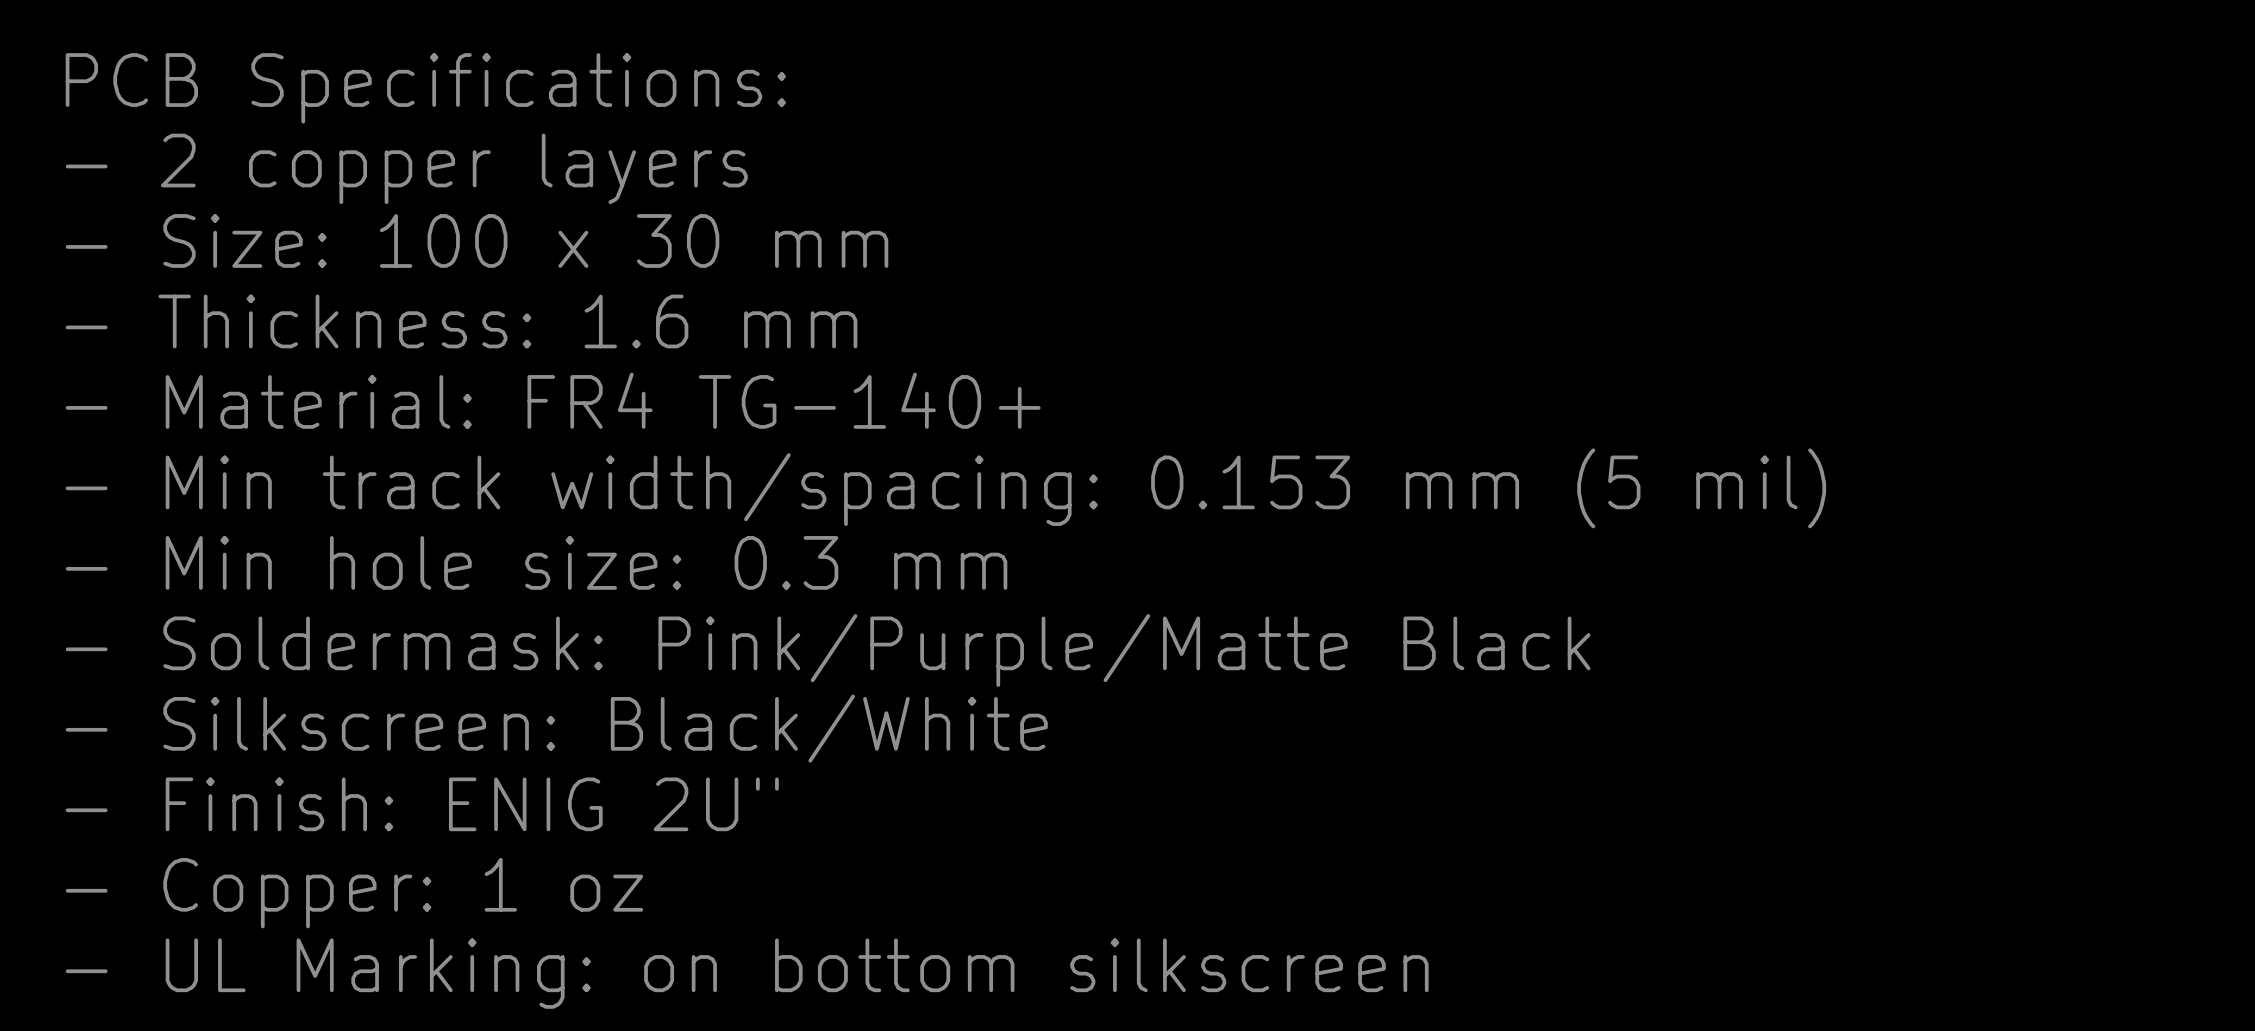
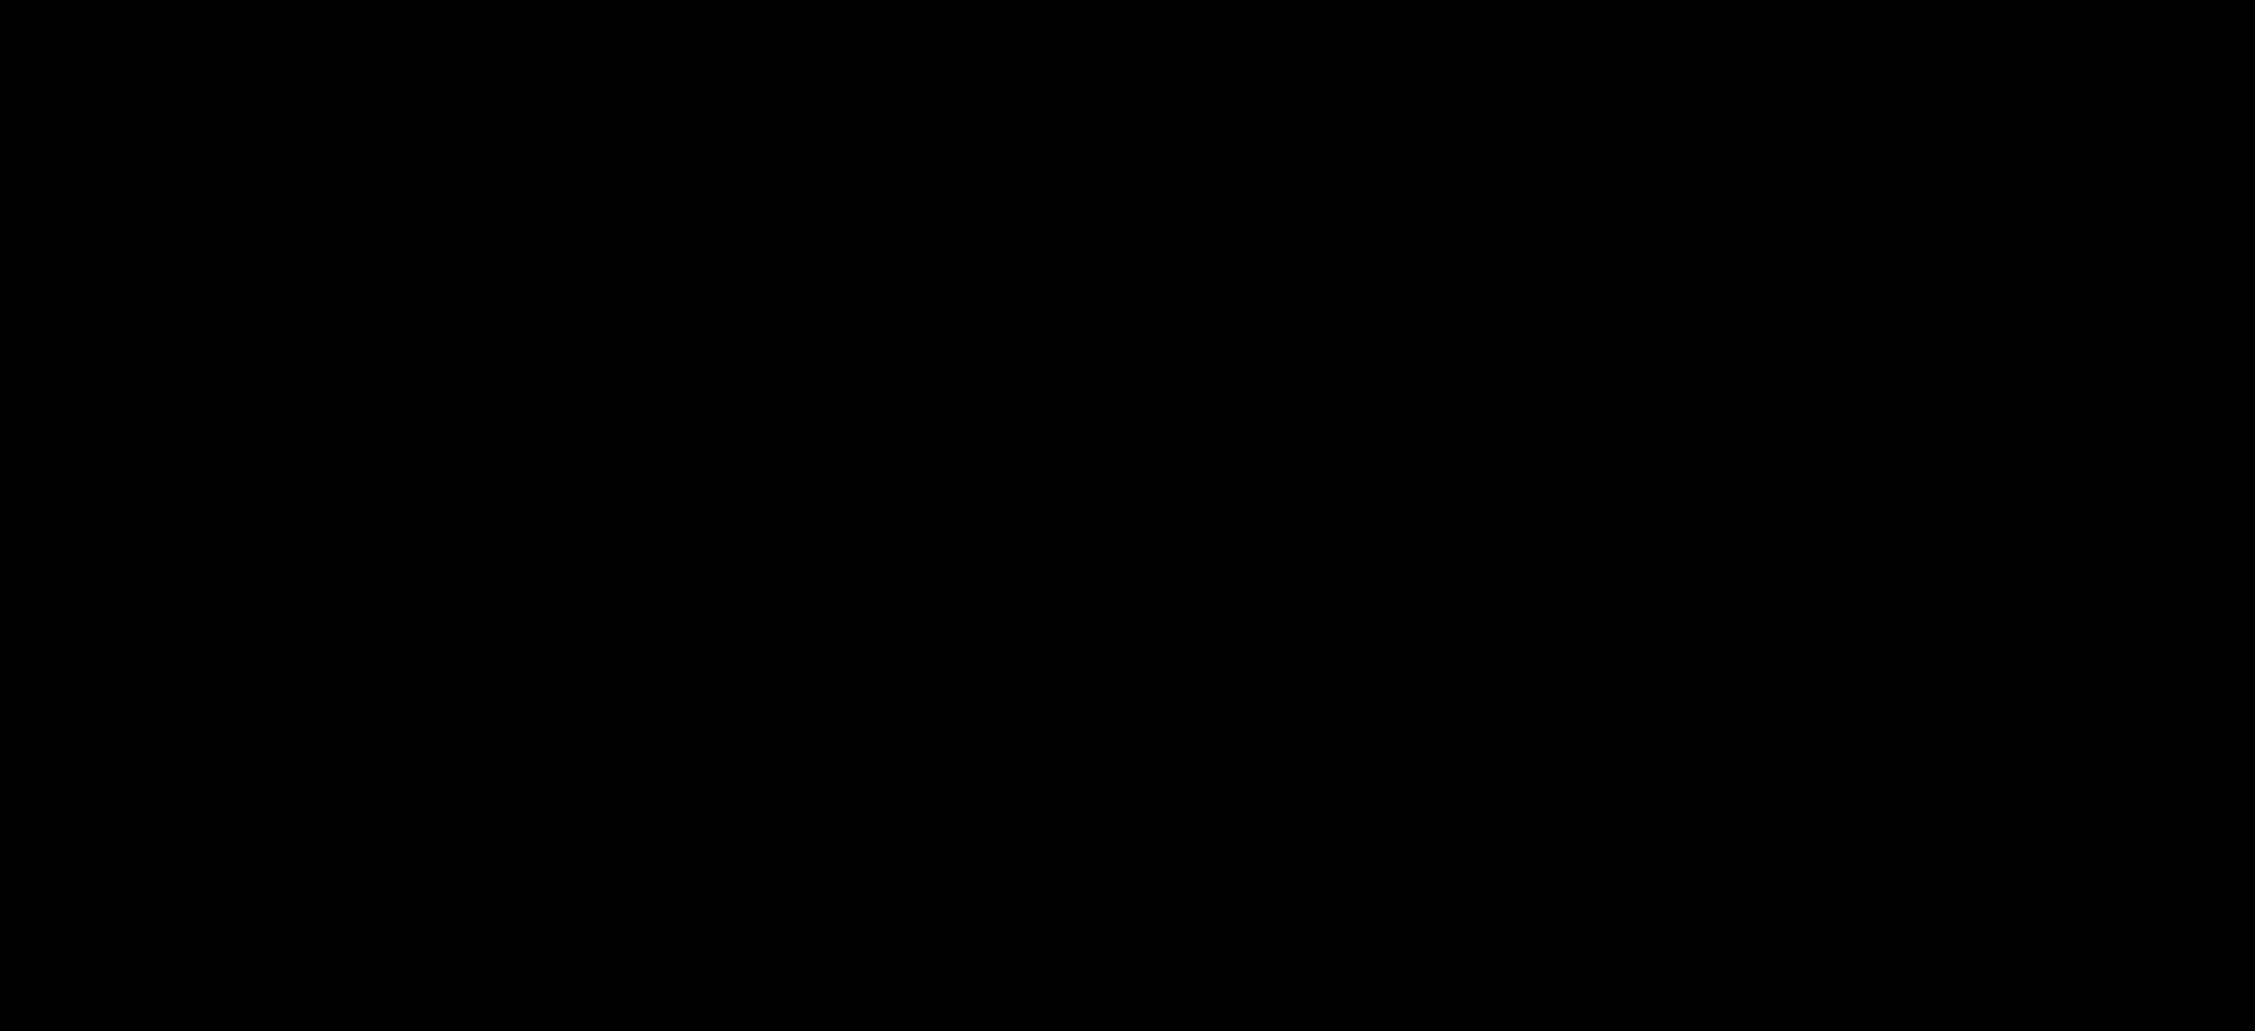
text: PCB Specifications: (425, 88) -> none
text: - 2 copper layers (406, 168) -> none
text: - Size: 100 x 30 mm (477, 240) -> none
text: - Thickness: 1.6 mm (461, 321) -> none
text: - Material: FR4 TG-140+ (553, 400) -> none
text: - Min track width/spacing: 0.153 mm (5 mil) (945, 488) -> none
text: - Min hole size: 0.3 mm (536, 562) -> none
text: - Soldermask: Pink/Purple/Matte Black (828, 650) -> none
text: - Silkscreen: Black/White (556, 728) -> none
text: - Finish: ENIG 2U" (422, 804) -> none
text: - Copper: 1 oz (354, 893) -> none
text: - UL Marking: on bottom silkscreen (747, 973) -> none

